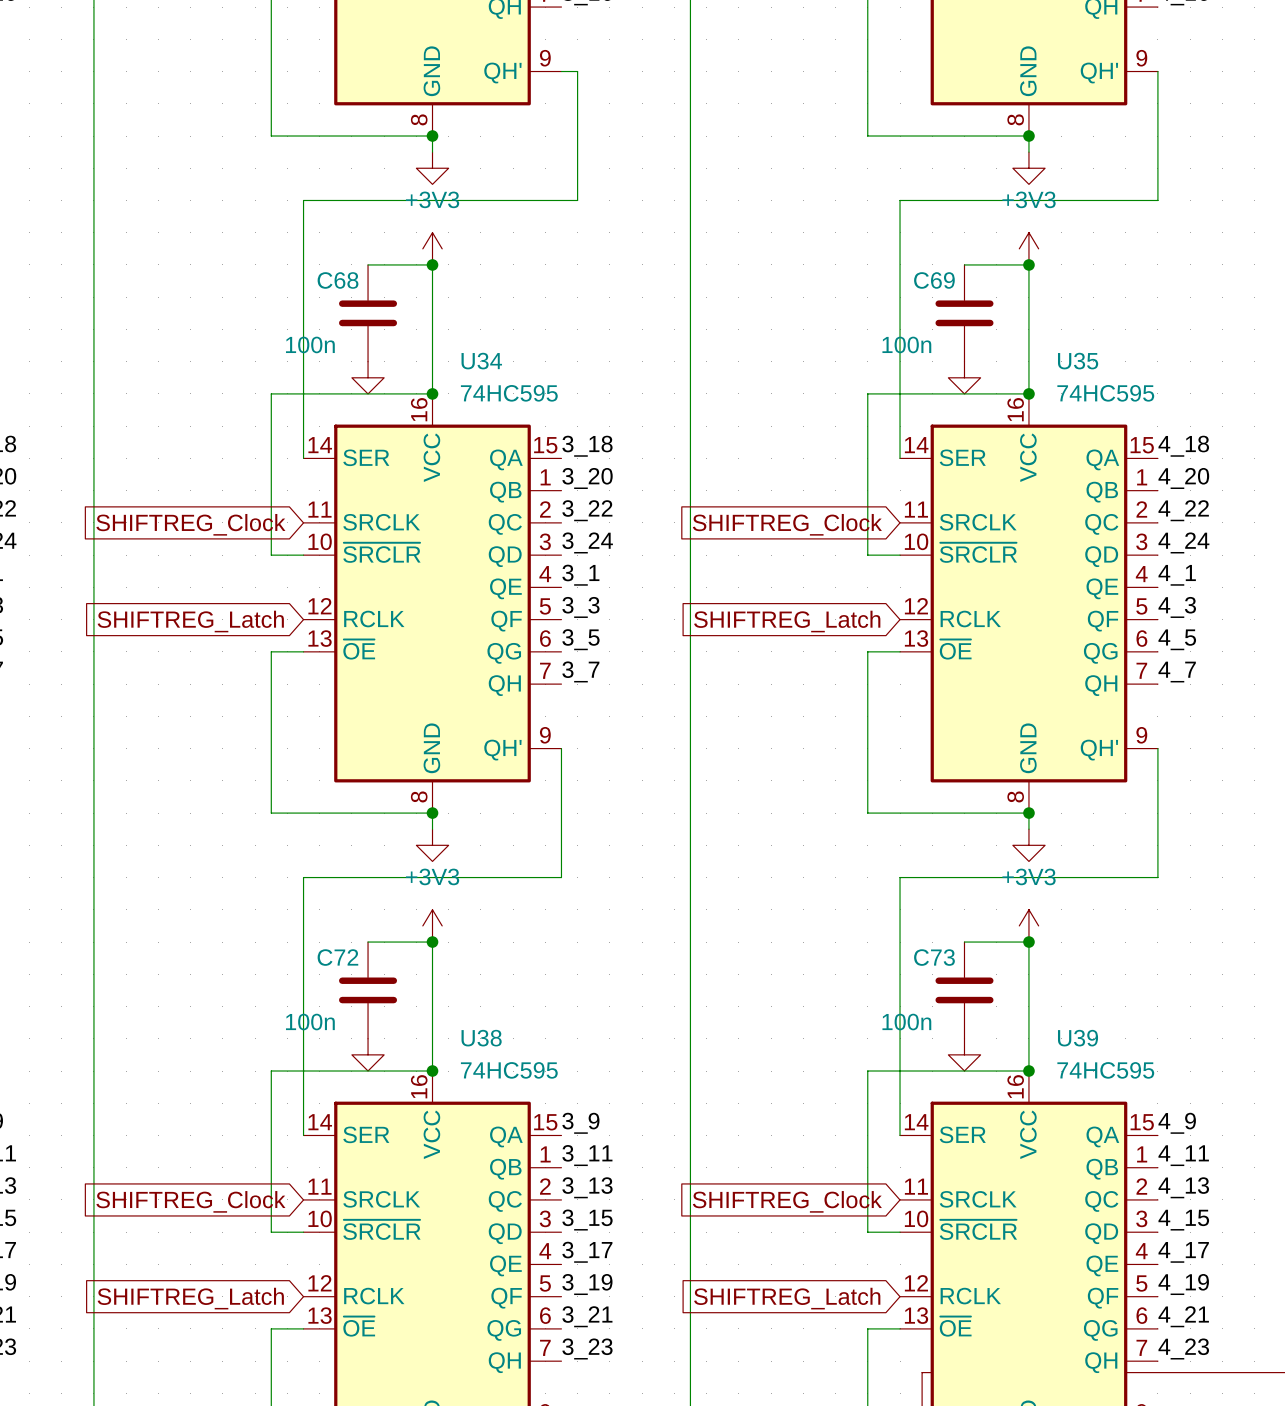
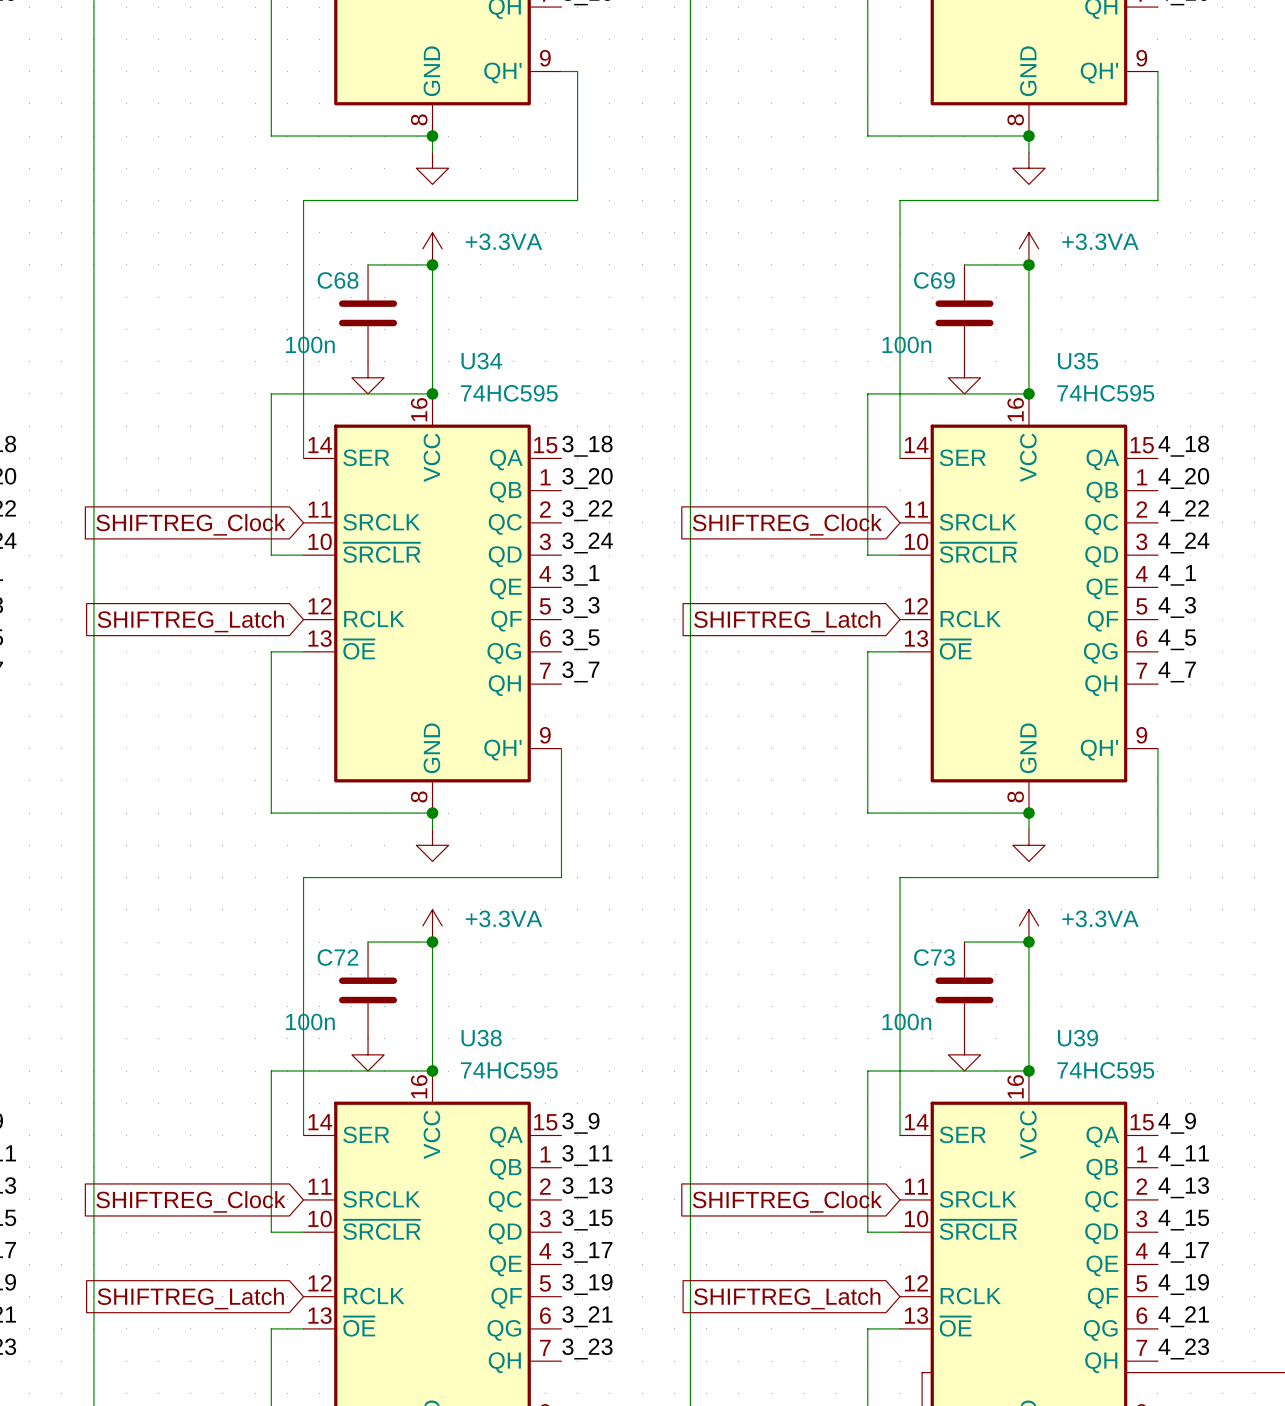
power symbol: +3V3 (432, 248) -> +3.3VA (432, 248)
power symbol: +3V3 (1028, 248) -> +3.3VA (1028, 248)
power symbol: +3V3 (432, 925) -> +3.3VA (432, 925)
power symbol: +3V3 (1028, 925) -> +3.3VA (1028, 925)

